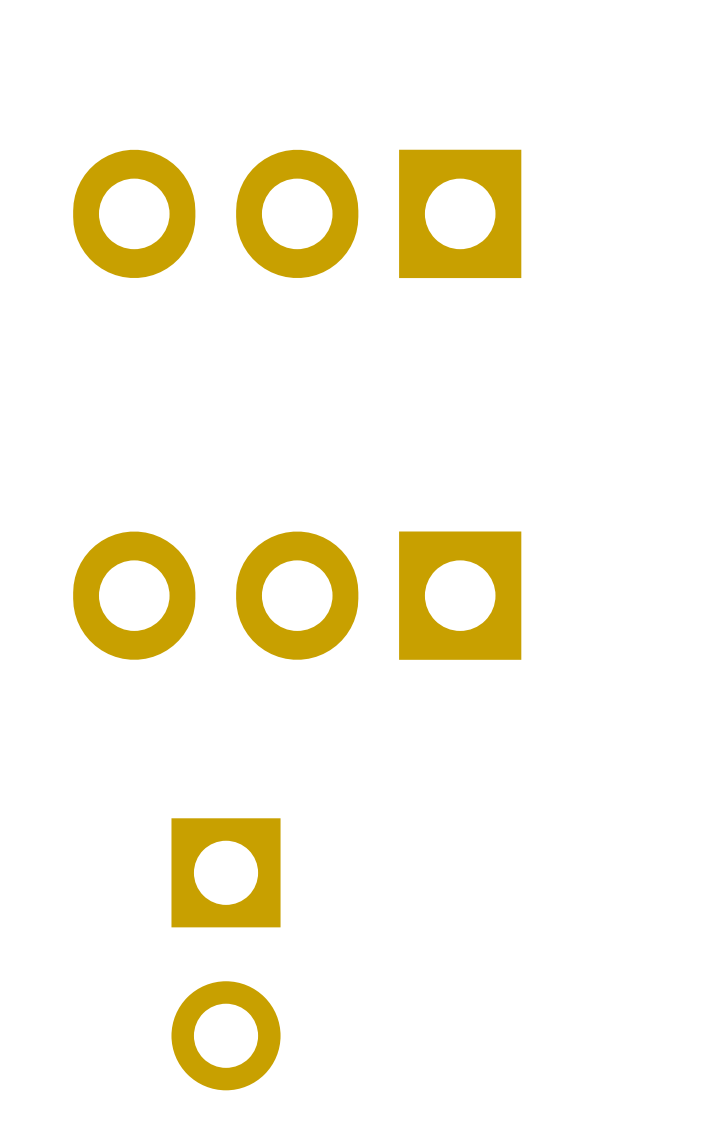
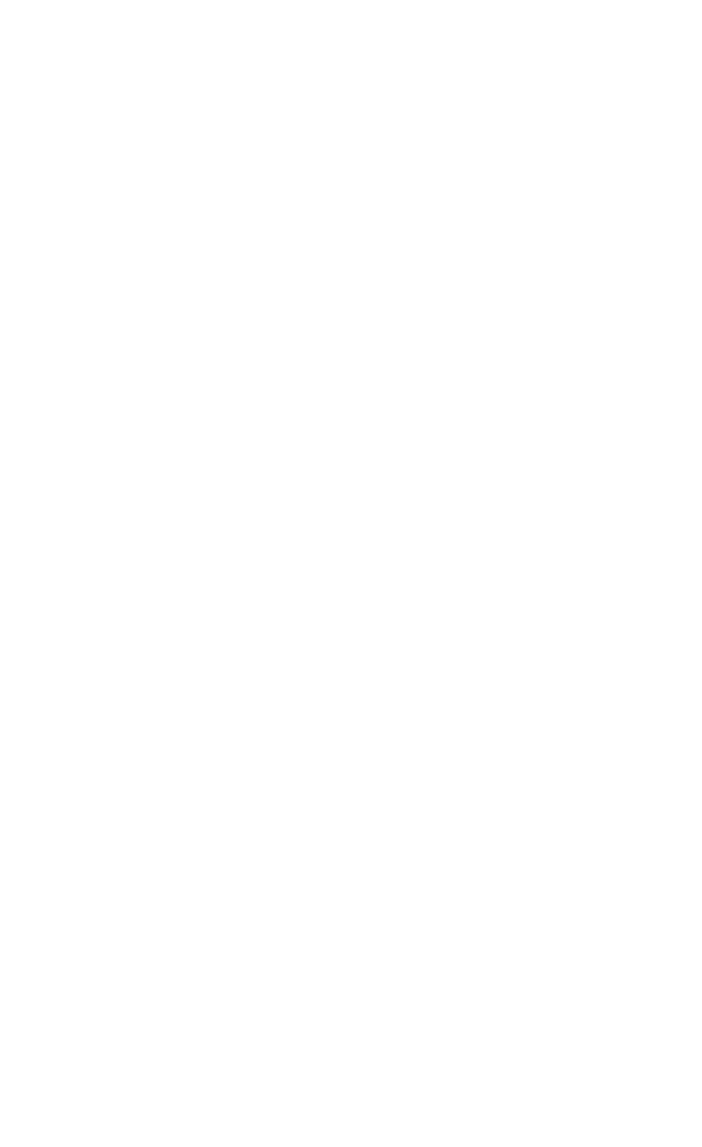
part: (297, 213) -> none
part: (297, 595) -> none
part: (226, 954) -> none

